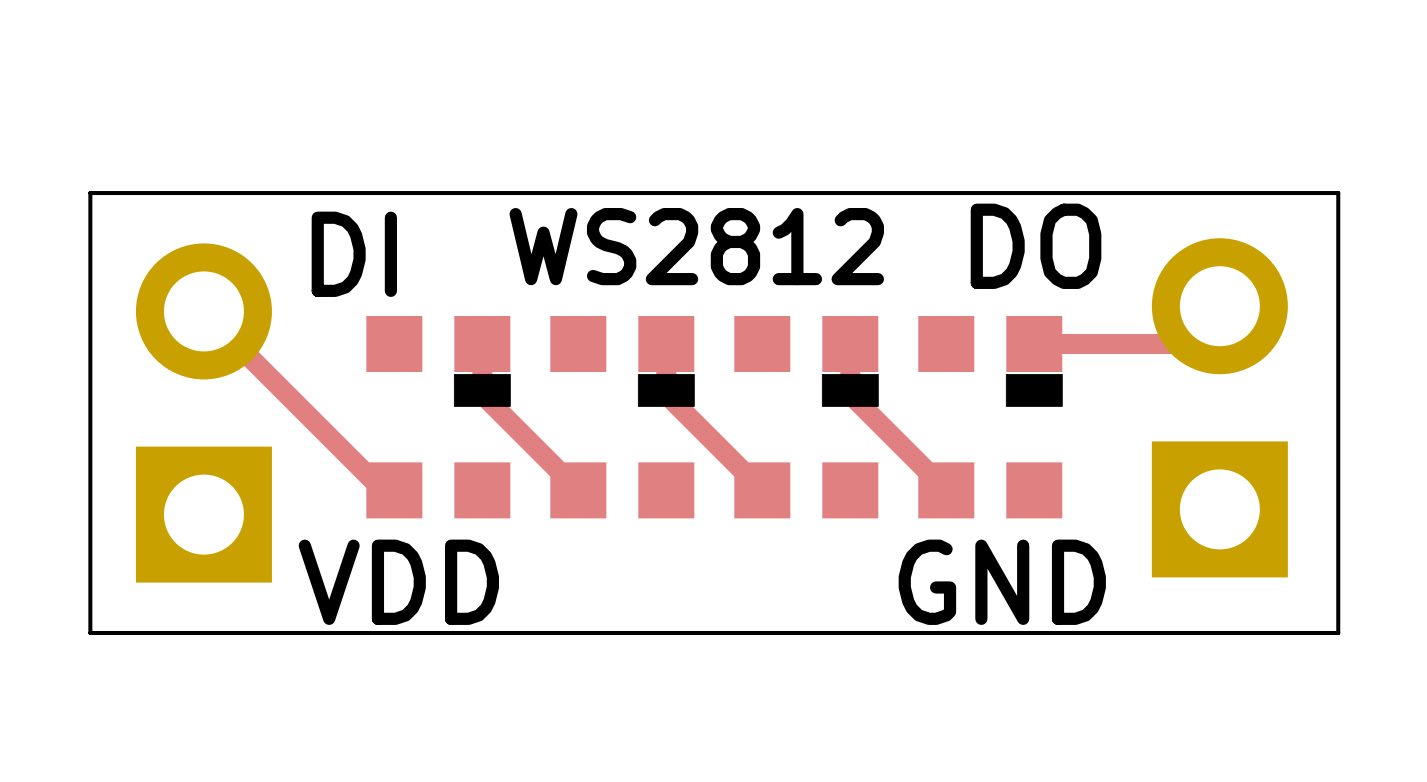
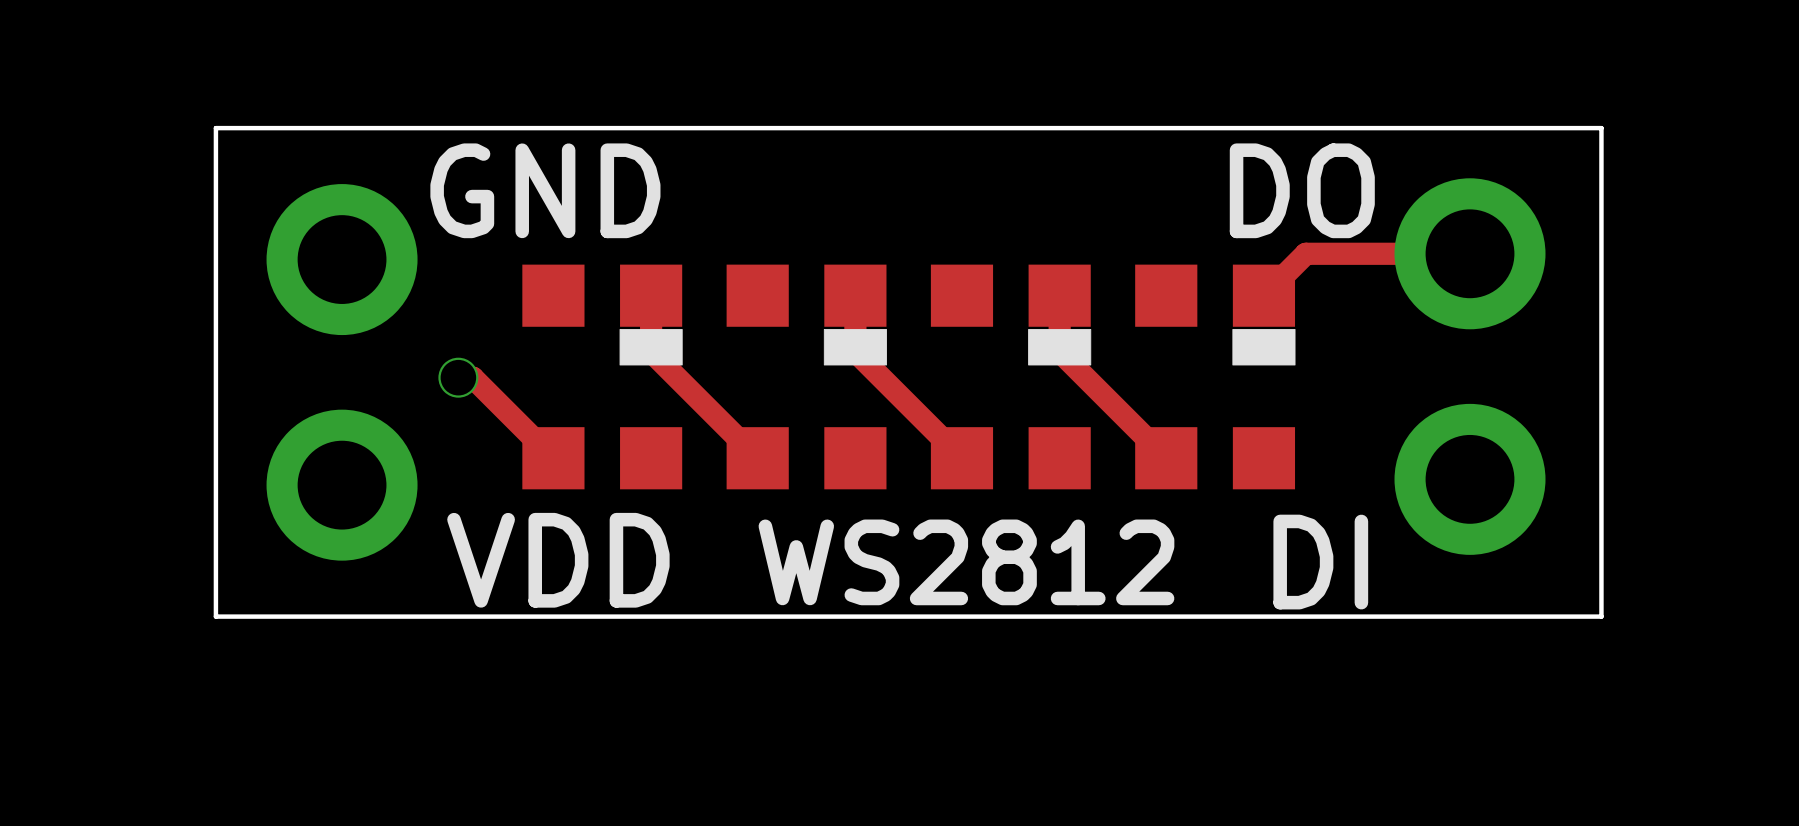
part footprint: [1151, 238, 1288, 578] -> [1394, 178, 1546, 555]
part footprint: [135, 243, 272, 583] -> [266, 184, 418, 561]
text position: WS2812 (696, 246) -> WS2812 (966, 562)
text position: DO (1036, 246) -> DO (1302, 190)
text position: DI (354, 254) -> DI (1320, 562)
track: (1219, 306) (1182, 343) (1034, 343) -> (1470, 253) (1305, 253) (1263, 295)
track: (203, 311) (382, 490) (394, 490) -> (458, 377) (472, 377) (553, 458)
via: none -> (458, 377)
text position: GND (1002, 582) -> GND (545, 190)

